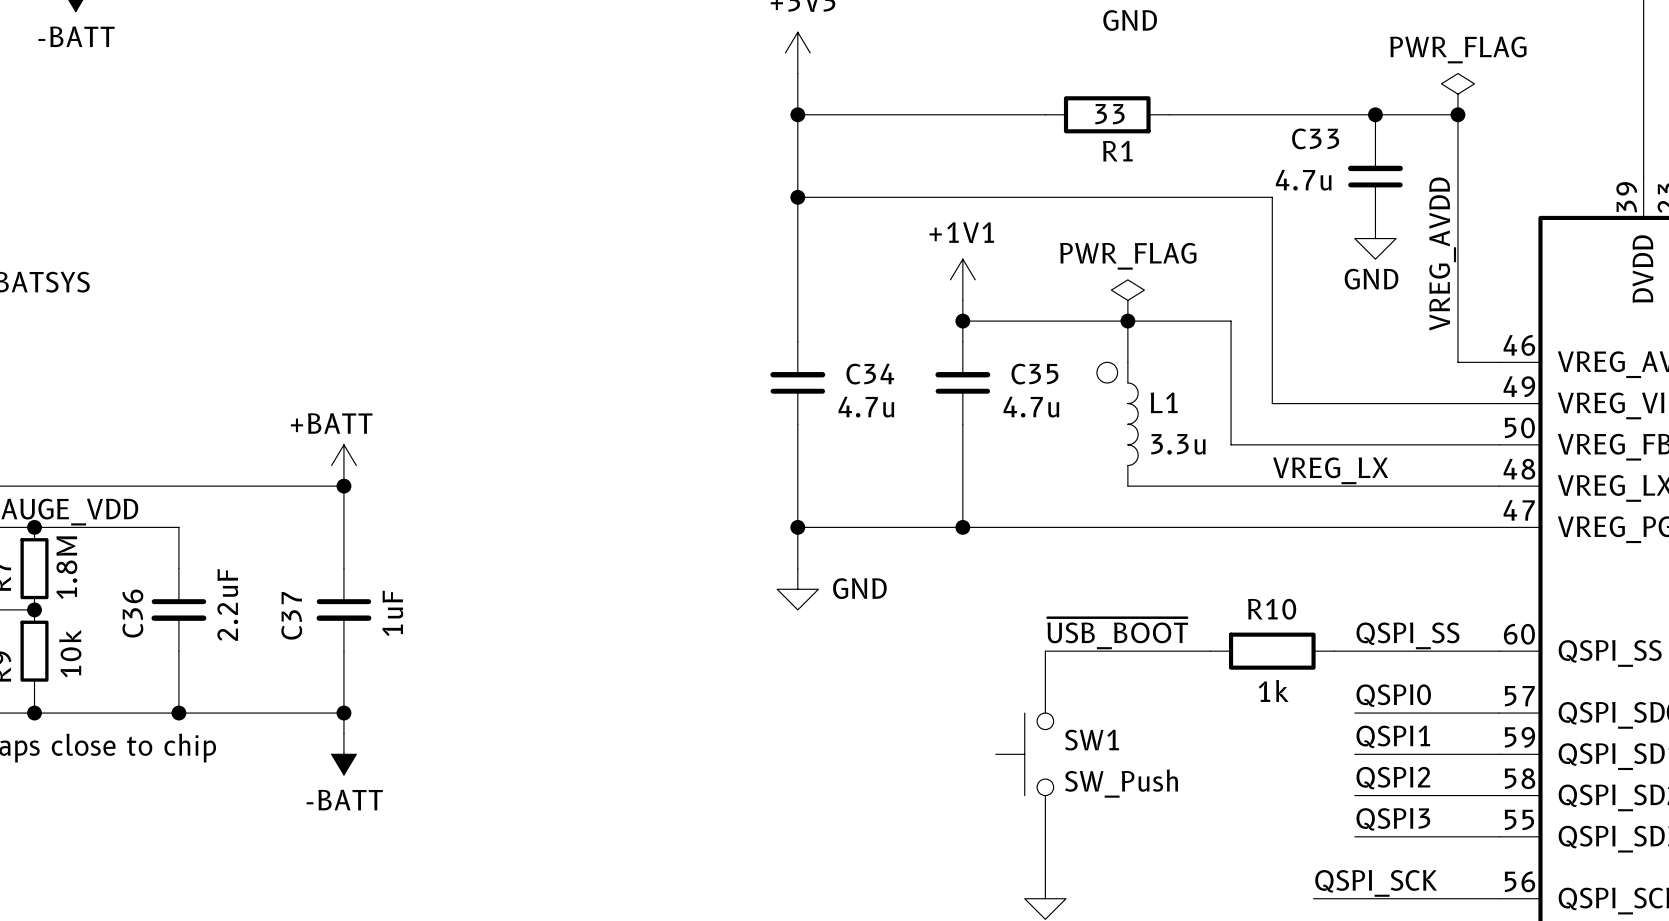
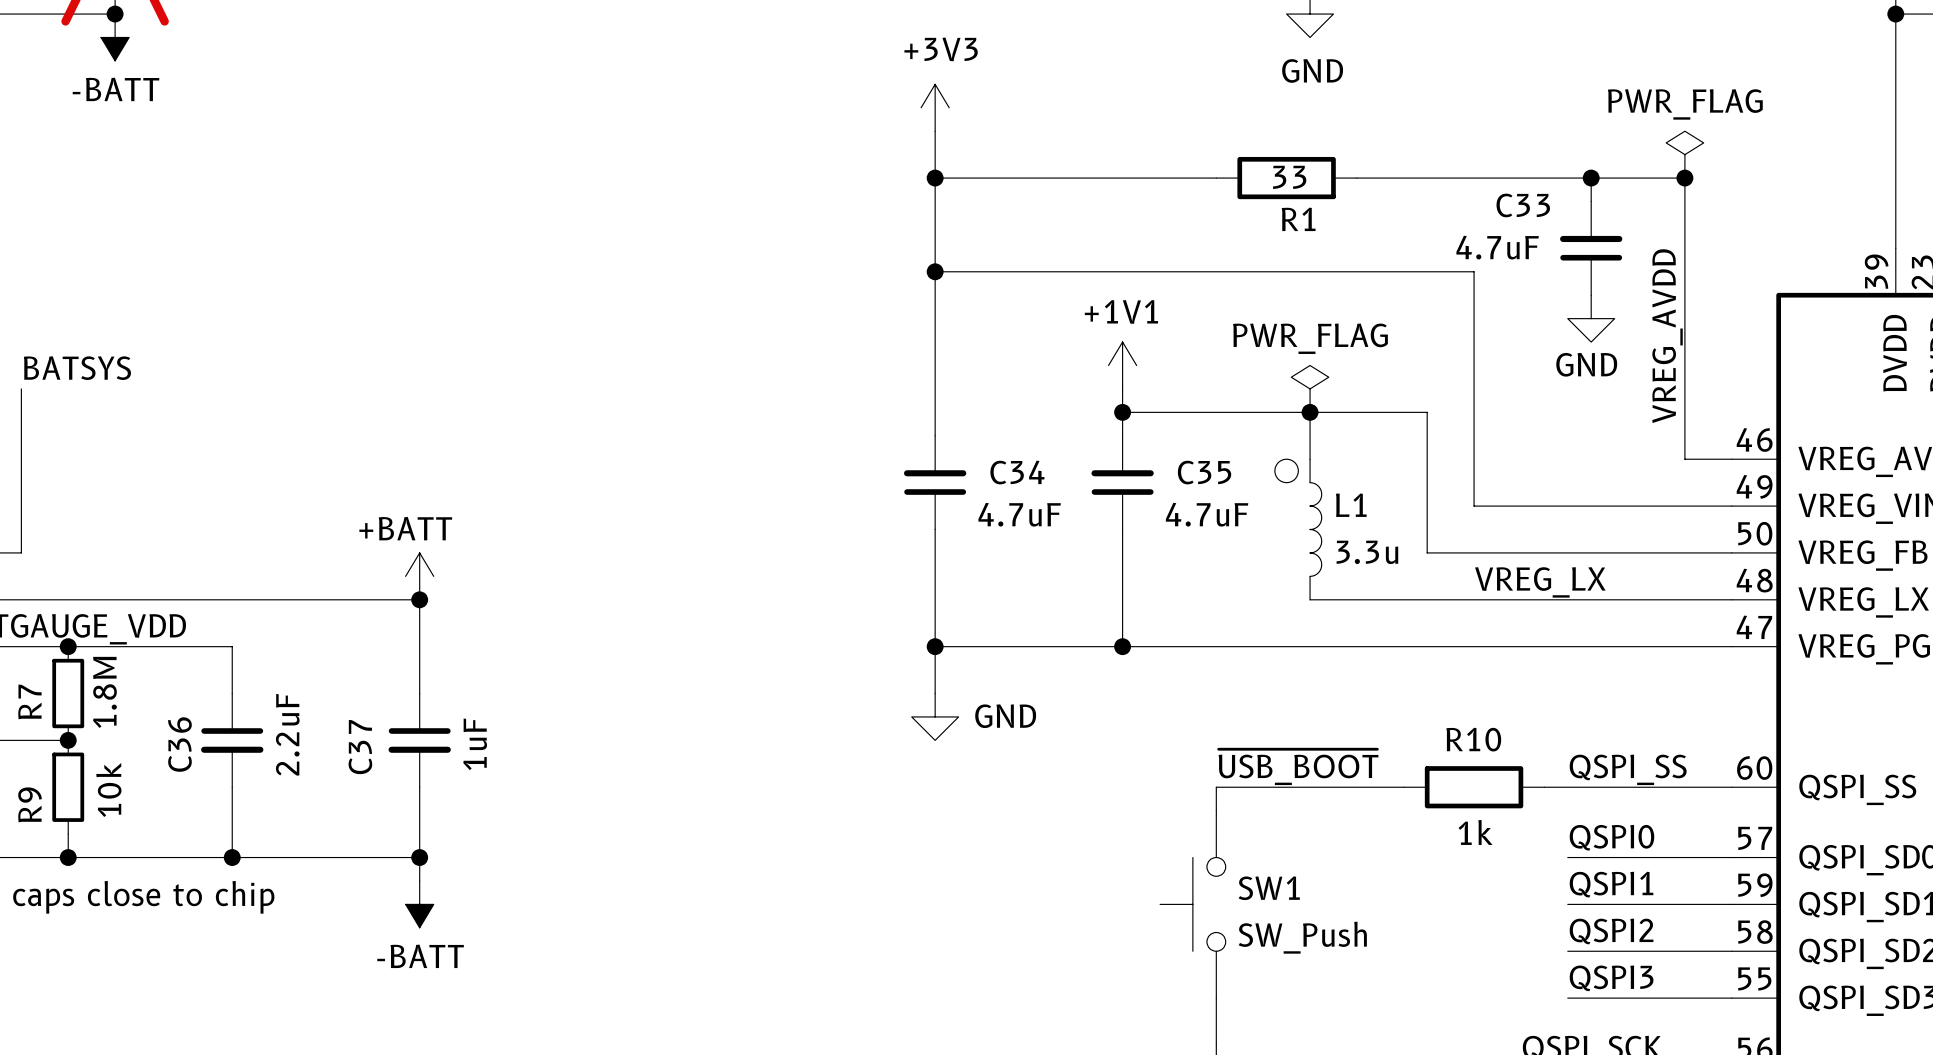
C33 value: 4.7u (1303, 180) -> 4.7uF (1497, 247)
C34 value: 4.7u (866, 407) -> 4.7uF (1019, 514)
C35 value: 4.7u (1031, 407) -> 4.7uF (1207, 514)

